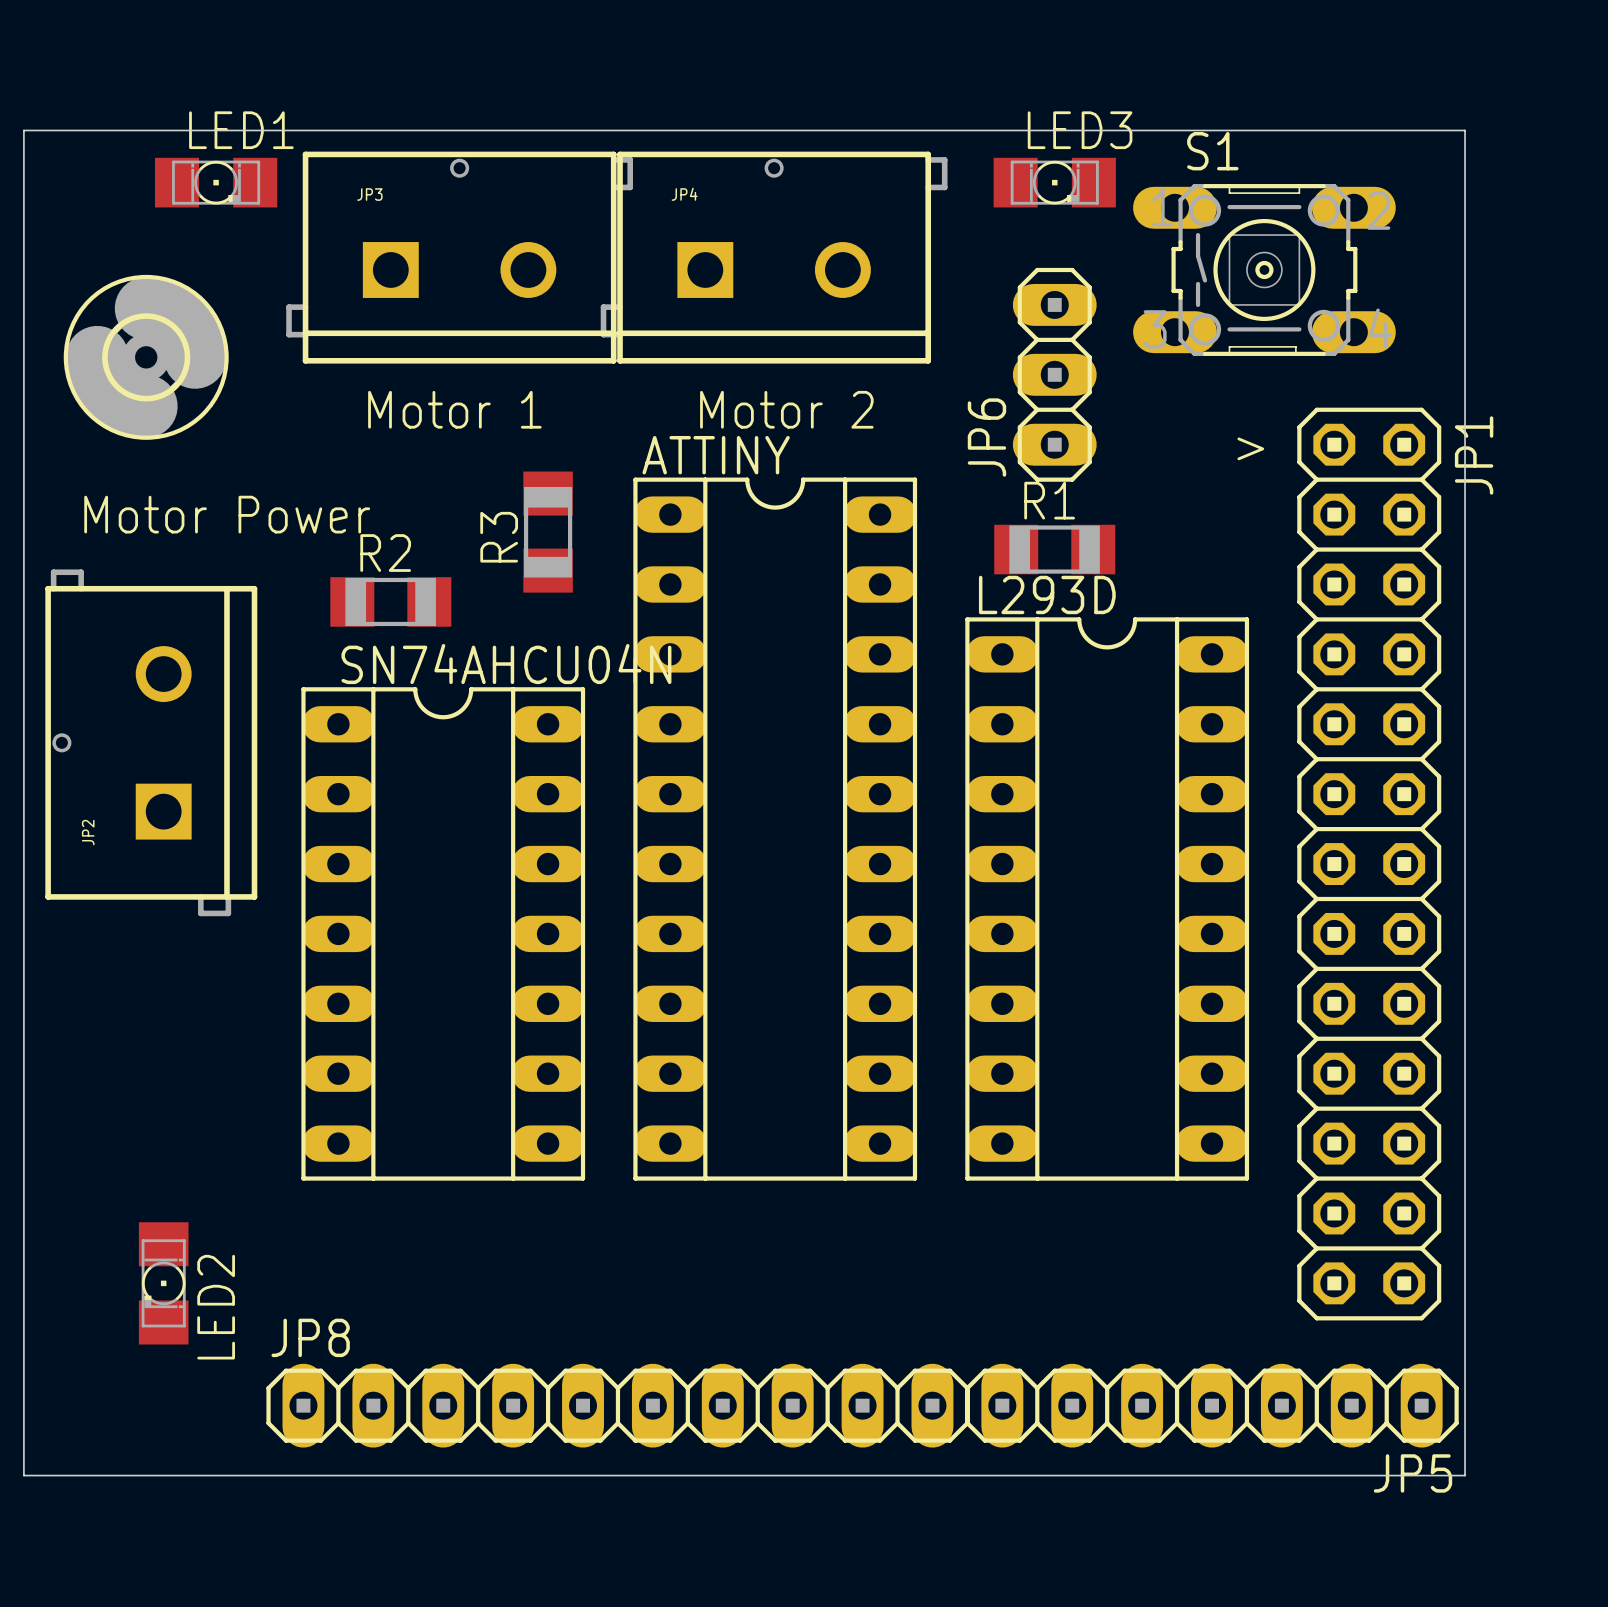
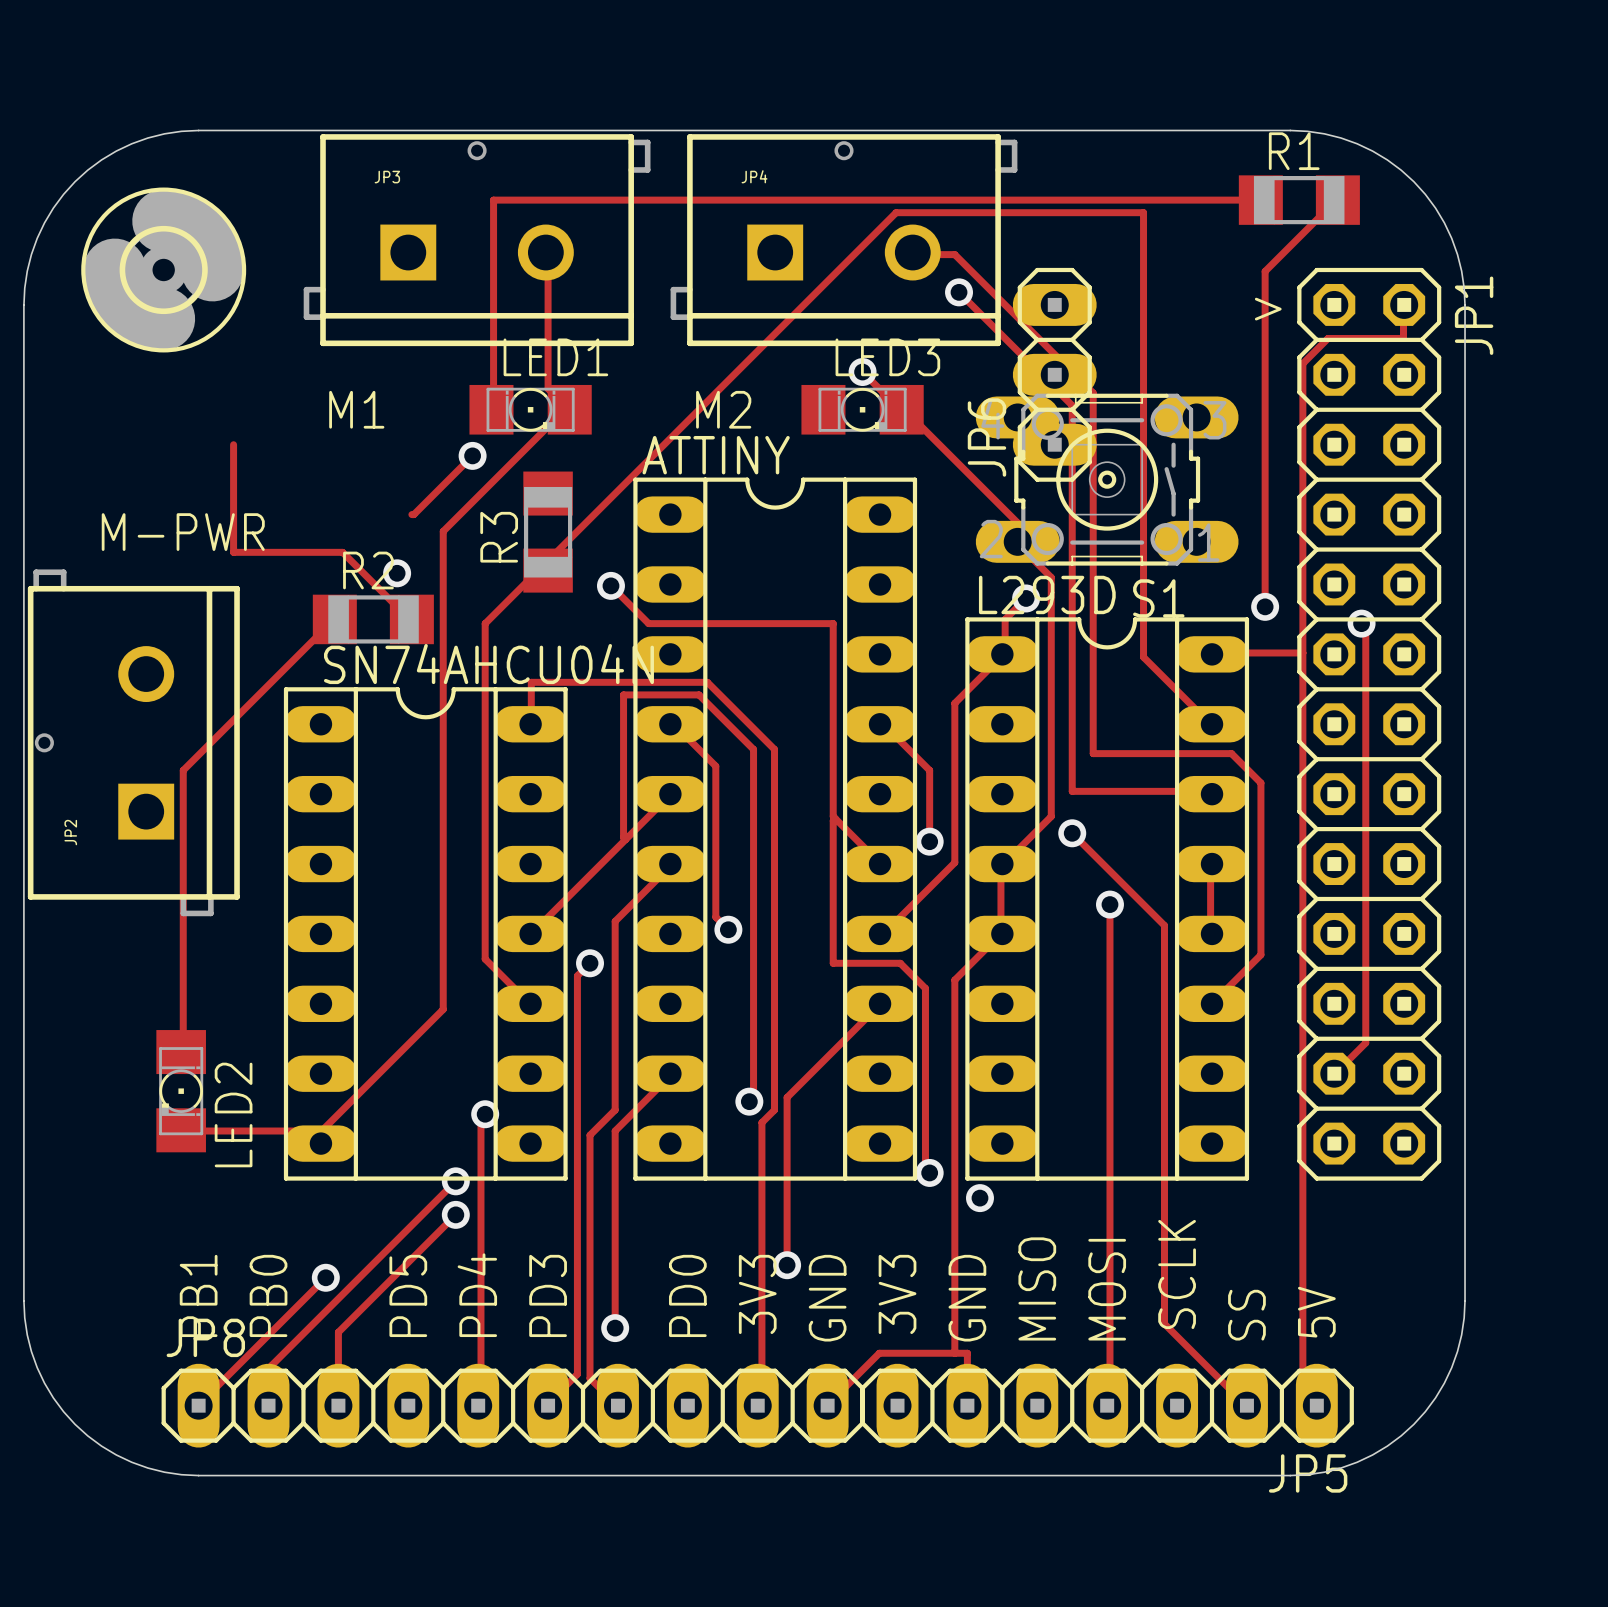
board edge: (198, 130) (23, 130) (23, 305) -> (198, 130) (164, 133) (131, 143) (101, 159) (75, 181) (53, 208) (37, 238) (27, 271) (23, 305)
board edge: (1290, 130) (1465, 130) (1465, 305) -> (1290, 130) (1324, 133) (1357, 143) (1387, 159) (1413, 181) (1435, 208) (1451, 238) (1461, 271) (1465, 305)
S1 name position: S1 (1212, 151) -> S1 (1158, 598)
LED1 position: (216, 182) -> (530, 409)
LED3 position: (1054, 182) -> (862, 409)
S1 footprint: [1133, 184, 1396, 356] -> [975, 393, 1239, 566]
track: none -> (1260, 200) (493, 200) (493, 409) (491, 409)
track: none -> (1337, 200) (1265, 271) (1265, 606)
track: none -> (545, 252) (548, 254) (548, 388) (569, 409)
track: none -> (912, 252) (912, 254) (954, 254) (1093, 392) (1093, 753) (1231, 753) (1260, 782) (1260, 954) (1212, 1003)
JP3 position: (459, 257) -> (477, 240)
JP4 position: (774, 257) -> (844, 240)
track: none -> (959, 292) (1072, 405) (1072, 791) (1210, 791) (1212, 794)
via: none -> (959, 292)
track: none -> (1404, 304) (1403, 338) (1328, 338) (1302, 363) (1302, 1391) (1316, 1405)
part position: (146, 357) -> (163, 269)
track: none -> (862, 372) (900, 409) (904, 409) (1017, 522) (1017, 543) (1051, 577) (1051, 816) (1000, 866) (1000, 933)
via: none -> (862, 372)
text: none -> M1 (356, 409)
text: Motor 1 (454, 409) -> none
track: none -> (569, 409) (564, 409) (443, 531) (443, 1009) (317, 1135) (320, 1143) (317, 1143) (317, 1131) (181, 1130)
text: none -> M2 (723, 409)
text: Motor 2 (786, 409) -> none
track: none -> (233, 444) (233, 552) (342, 552) (409, 619) (411, 619)
text position: > (1250, 448) -> > (1268, 309)
track: none -> (472, 455) (411, 514)
via: none -> (472, 455)
text: Motor Power (227, 514) -> M-PWR (183, 532)
R1 position: (1054, 549) -> (1299, 200)
via: none -> (397, 573)
track: none -> (610, 585) (648, 623) (833, 623) (833, 816) (880, 864)
via: none -> (610, 585)
track: none -> (1026, 598) (1005, 619) (1005, 652) (954, 703) (954, 862) (883, 933) (880, 933)
via: none -> (1026, 598)
R2 position: (390, 601) -> (373, 619)
via: none -> (1265, 606)
track: none -> (334, 619) (183, 770) (183, 1051) (181, 1052)
track: none -> (1361, 623) (1365, 627) (1365, 1042) (1334, 1073)
via: none -> (1361, 623)
track: none -> (1302, 652) (1212, 654)
track: none -> (530, 724) (531, 682) (707, 682) (774, 749) (774, 1110) (761, 1122) (761, 1399) (757, 1405)
track: none -> (670, 724) (673, 724) (715, 766) (715, 917) (728, 929)
track: none -> (880, 724) (883, 724) (929, 770) (929, 841)
track: none -> (1212, 724) (1143, 657) (1143, 212) (896, 212) (485, 623) (485, 959) (530, 1003)
JP2 position: (151, 742) -> (133, 742)
track: none -> (670, 794) (530, 933)
track: none -> (835, 818) (833, 820) (833, 963) (900, 963) (925, 988) (925, 1168) (929, 1172)
track: none -> (1072, 833) (1164, 925) (1164, 1323) (1246, 1405)
via: none -> (1072, 833)
track: none -> (625, 839) (623, 837) (623, 694) (699, 694) (753, 749) (753, 1097) (749, 1101)
via: none -> (929, 841)
track: none -> (670, 864) (615, 921) (615, 1110) (590, 1135) (590, 1378) (617, 1405)
track: none -> (1212, 864) (1212, 933)
JP1 position: (1369, 864) -> (1369, 724)
track: none -> (1109, 904) (1109, 1403) (1107, 1405)
via: none -> (1109, 904)
via: none -> (728, 929)
SN74AHCU04N position: (443, 933) -> (425, 933)
track: none -> (1000, 933) (954, 980) (954, 1353)
track: none -> (590, 963) (577, 975) (577, 1374) (548, 1405)
via: none -> (590, 963)
track: none -> (880, 1003) (787, 1097) (787, 1265)
track: none -> (670, 1073) (615, 1131) (615, 1328)
via: none -> (749, 1101)
track: none -> (485, 1114) (480, 1118) (480, 1403) (478, 1405)
via: none -> (485, 1114)
via: none -> (929, 1172)
track: none -> (455, 1181) (271, 1365) (271, 1403) (268, 1405)
via: none -> (455, 1181)
via: none -> (979, 1198)
track: none -> (455, 1214) (338, 1332) (338, 1405)
via: none -> (455, 1214)
via: none -> (787, 1265)
text: none -> SCLK (1177, 1274)
track: none -> (325, 1277) (198, 1405)
via: none -> (325, 1277)
LED2 position: (163, 1283) -> (181, 1091)
text: none -> MISO (1037, 1288)
text: none -> MOSI (1107, 1289)
text: none -> 3V3 (757, 1294)
text: none -> 3V3 (897, 1294)
text: none -> PB1 (198, 1295)
text: none -> PB0 (268, 1295)
text: none -> PD5 (408, 1295)
text: none -> PD4 (477, 1295)
text: none -> PD3 (548, 1295)
text: none -> PD0 (687, 1295)
text: none -> GND (827, 1298)
text: none -> GND (967, 1298)
board edge: (23, 1300) (23, 1475) (198, 1475) -> (23, 1300) (27, 1334) (37, 1367) (53, 1397) (75, 1424) (101, 1446) (131, 1462) (164, 1472) (198, 1475)
board edge: (1465, 1300) (1465, 1475) (1290, 1475) -> (1465, 1300) (1461, 1334) (1451, 1367) (1435, 1397) (1413, 1424) (1387, 1446) (1357, 1462) (1324, 1472) (1290, 1475)
text: none -> 5V (1316, 1312)
text: none -> SS (1246, 1315)
via: none -> (615, 1328)
JP8 position: (617, 1405) -> (513, 1405)
track: none -> (827, 1405) (879, 1353) (967, 1353) (967, 1405)
JP5 position: (1212, 1405) -> (1107, 1405)

